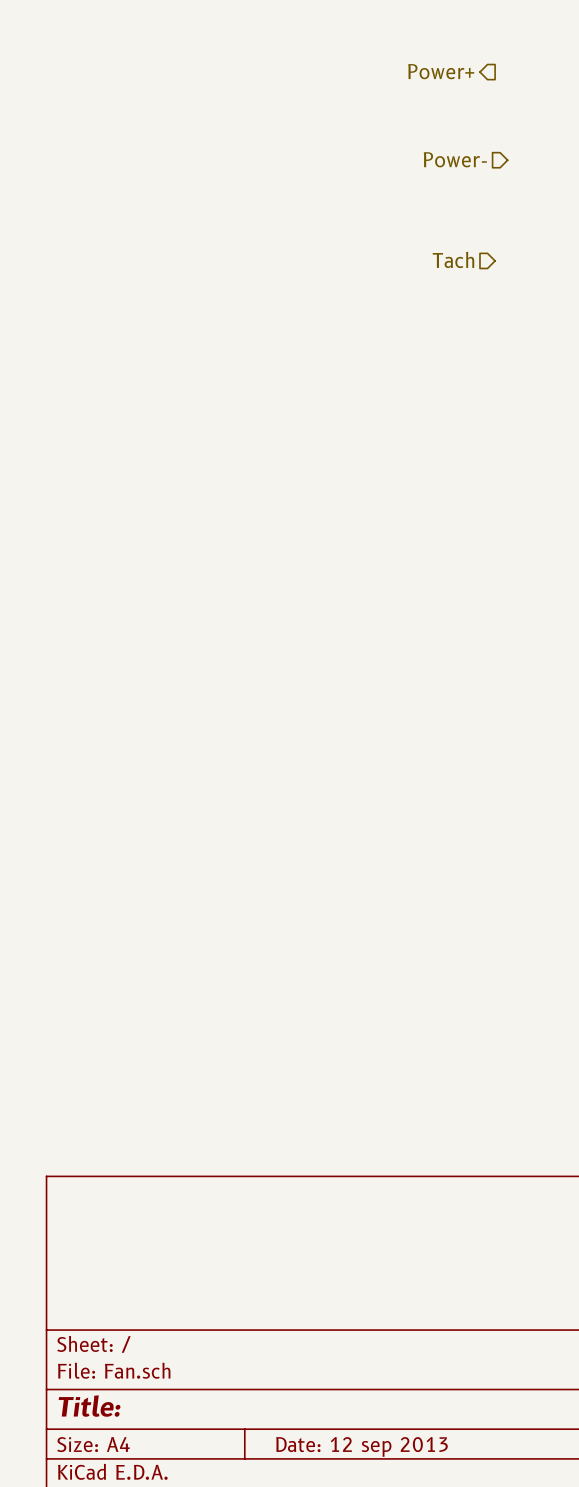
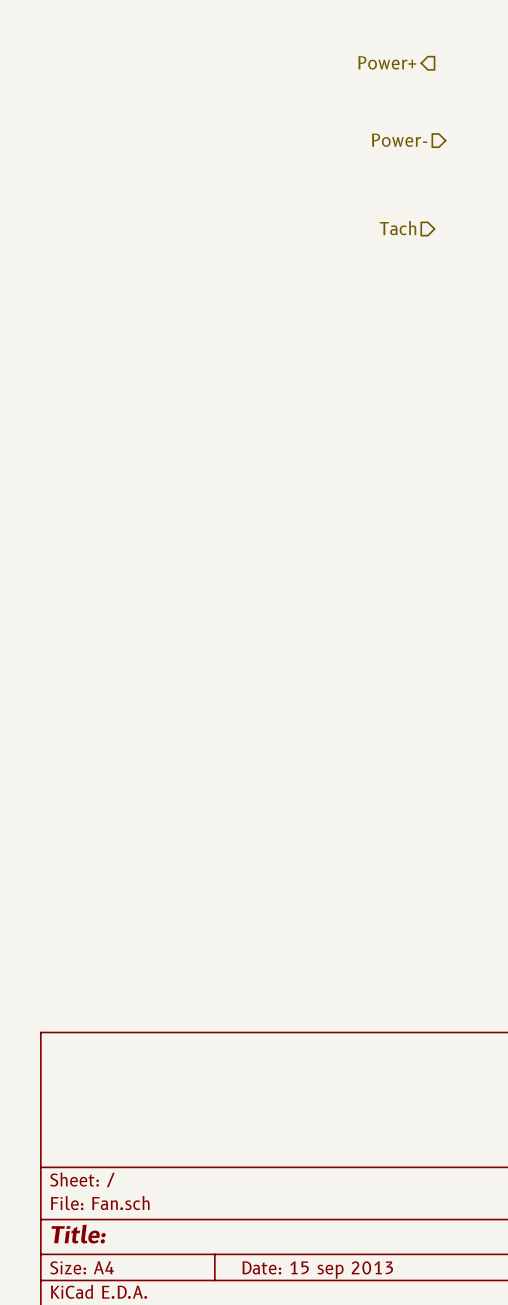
title block: Date: 12 sep 2013 (361, 1446) -> Date: 15 sep 2013 (317, 1269)

